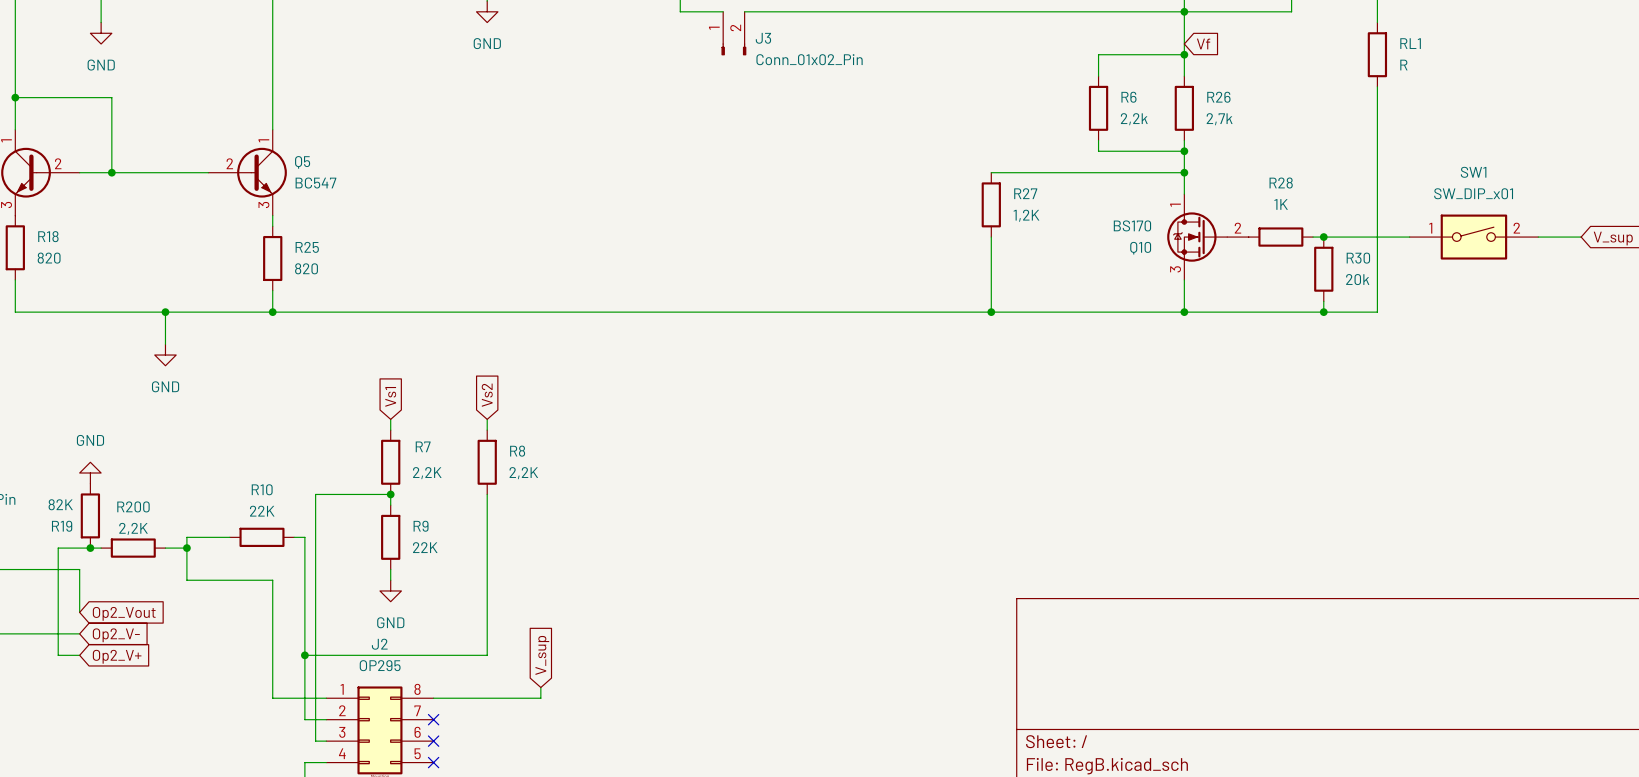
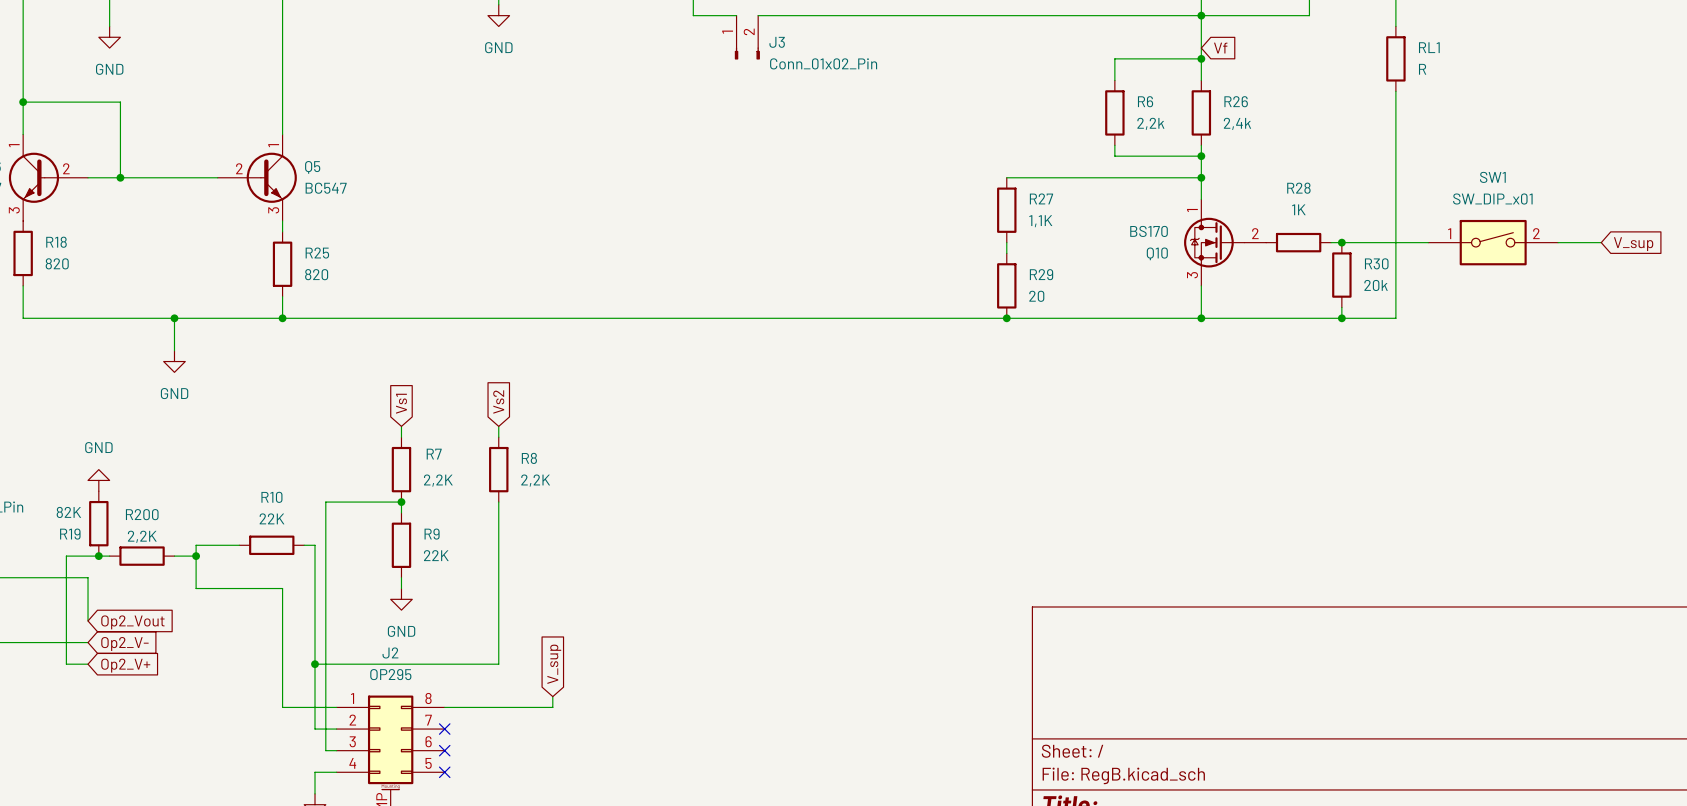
R26 value: 2,7k (1219, 119) -> 2,4k (1237, 123)
R27 value: 1,2K (1026, 215) -> 1,1K (1040, 221)
wire: (991, 247) (991, 312) -> none
R29: none -> 20 (1006, 285)

